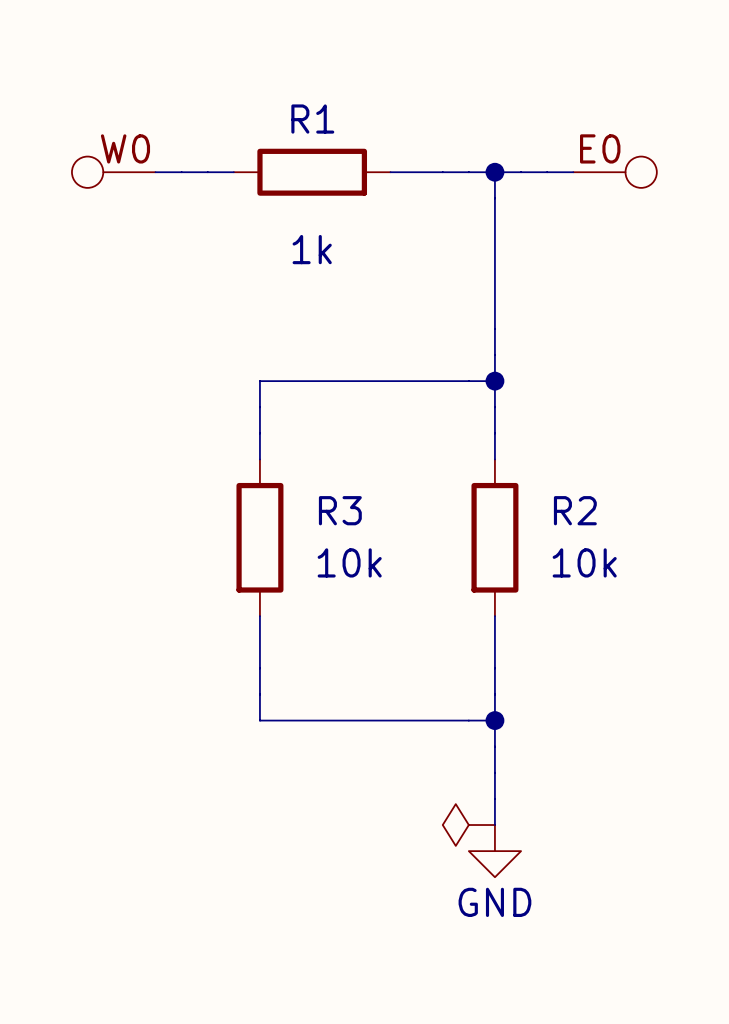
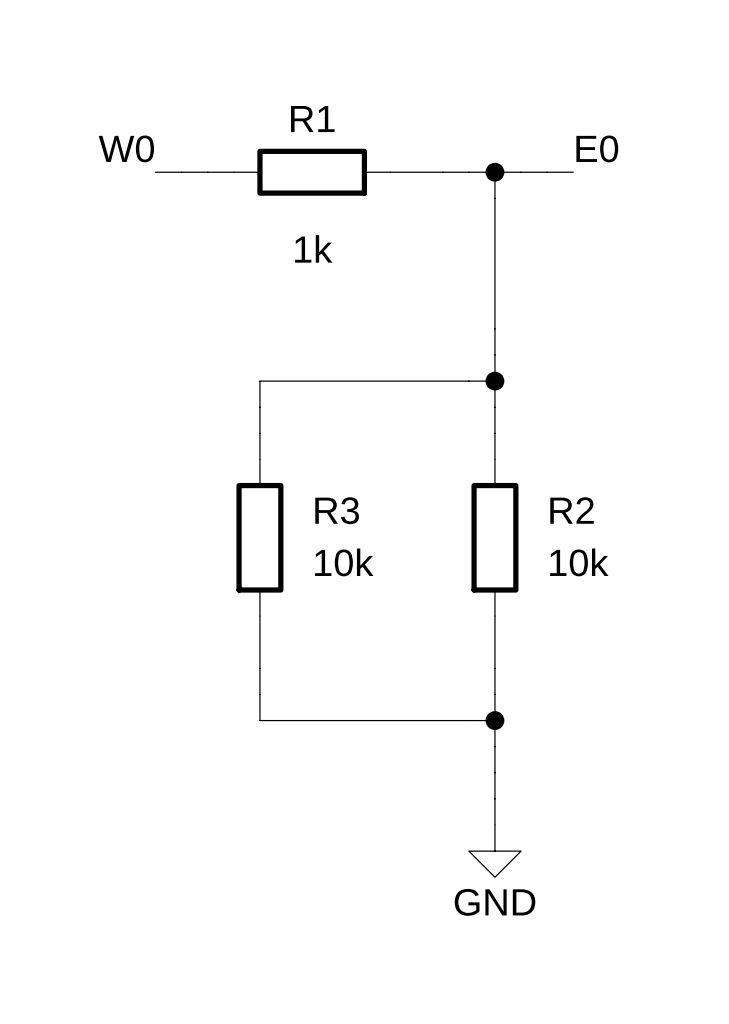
part: (113, 172) -> none
part: (615, 172) -> none
power symbol: (468, 825) -> none

